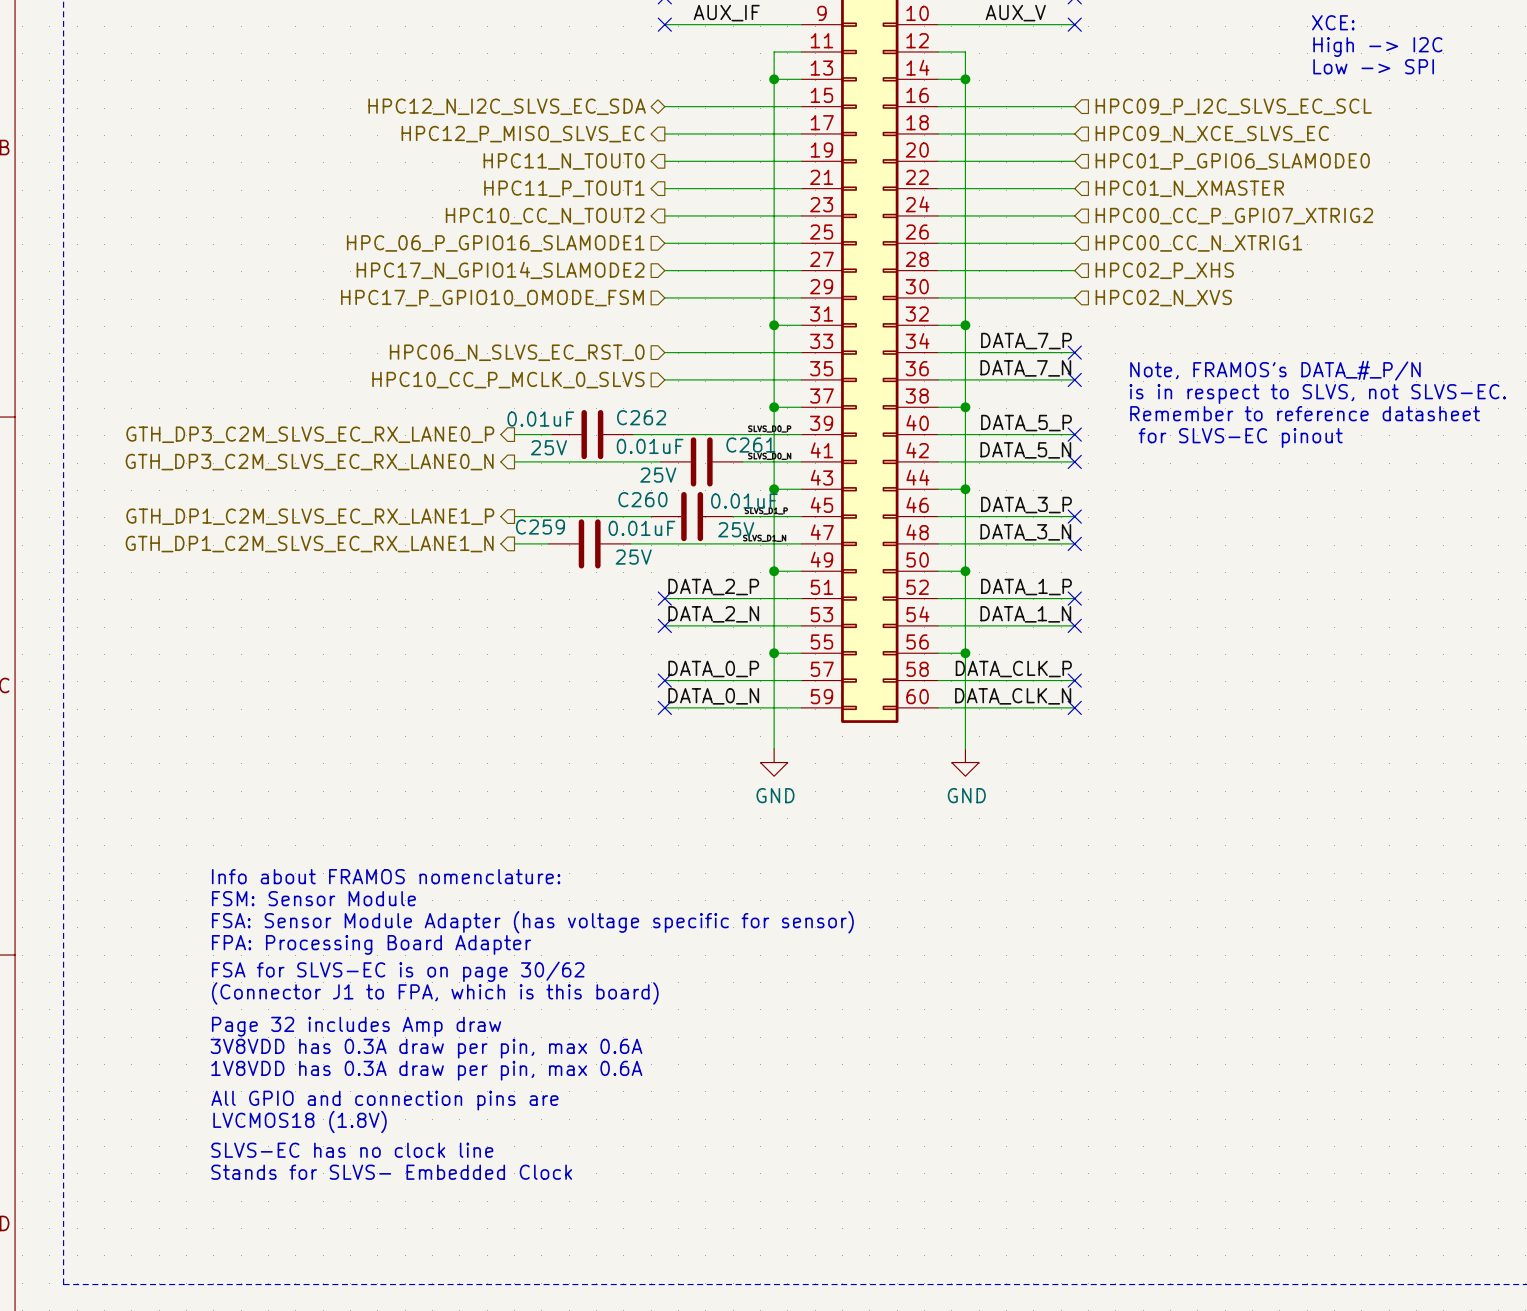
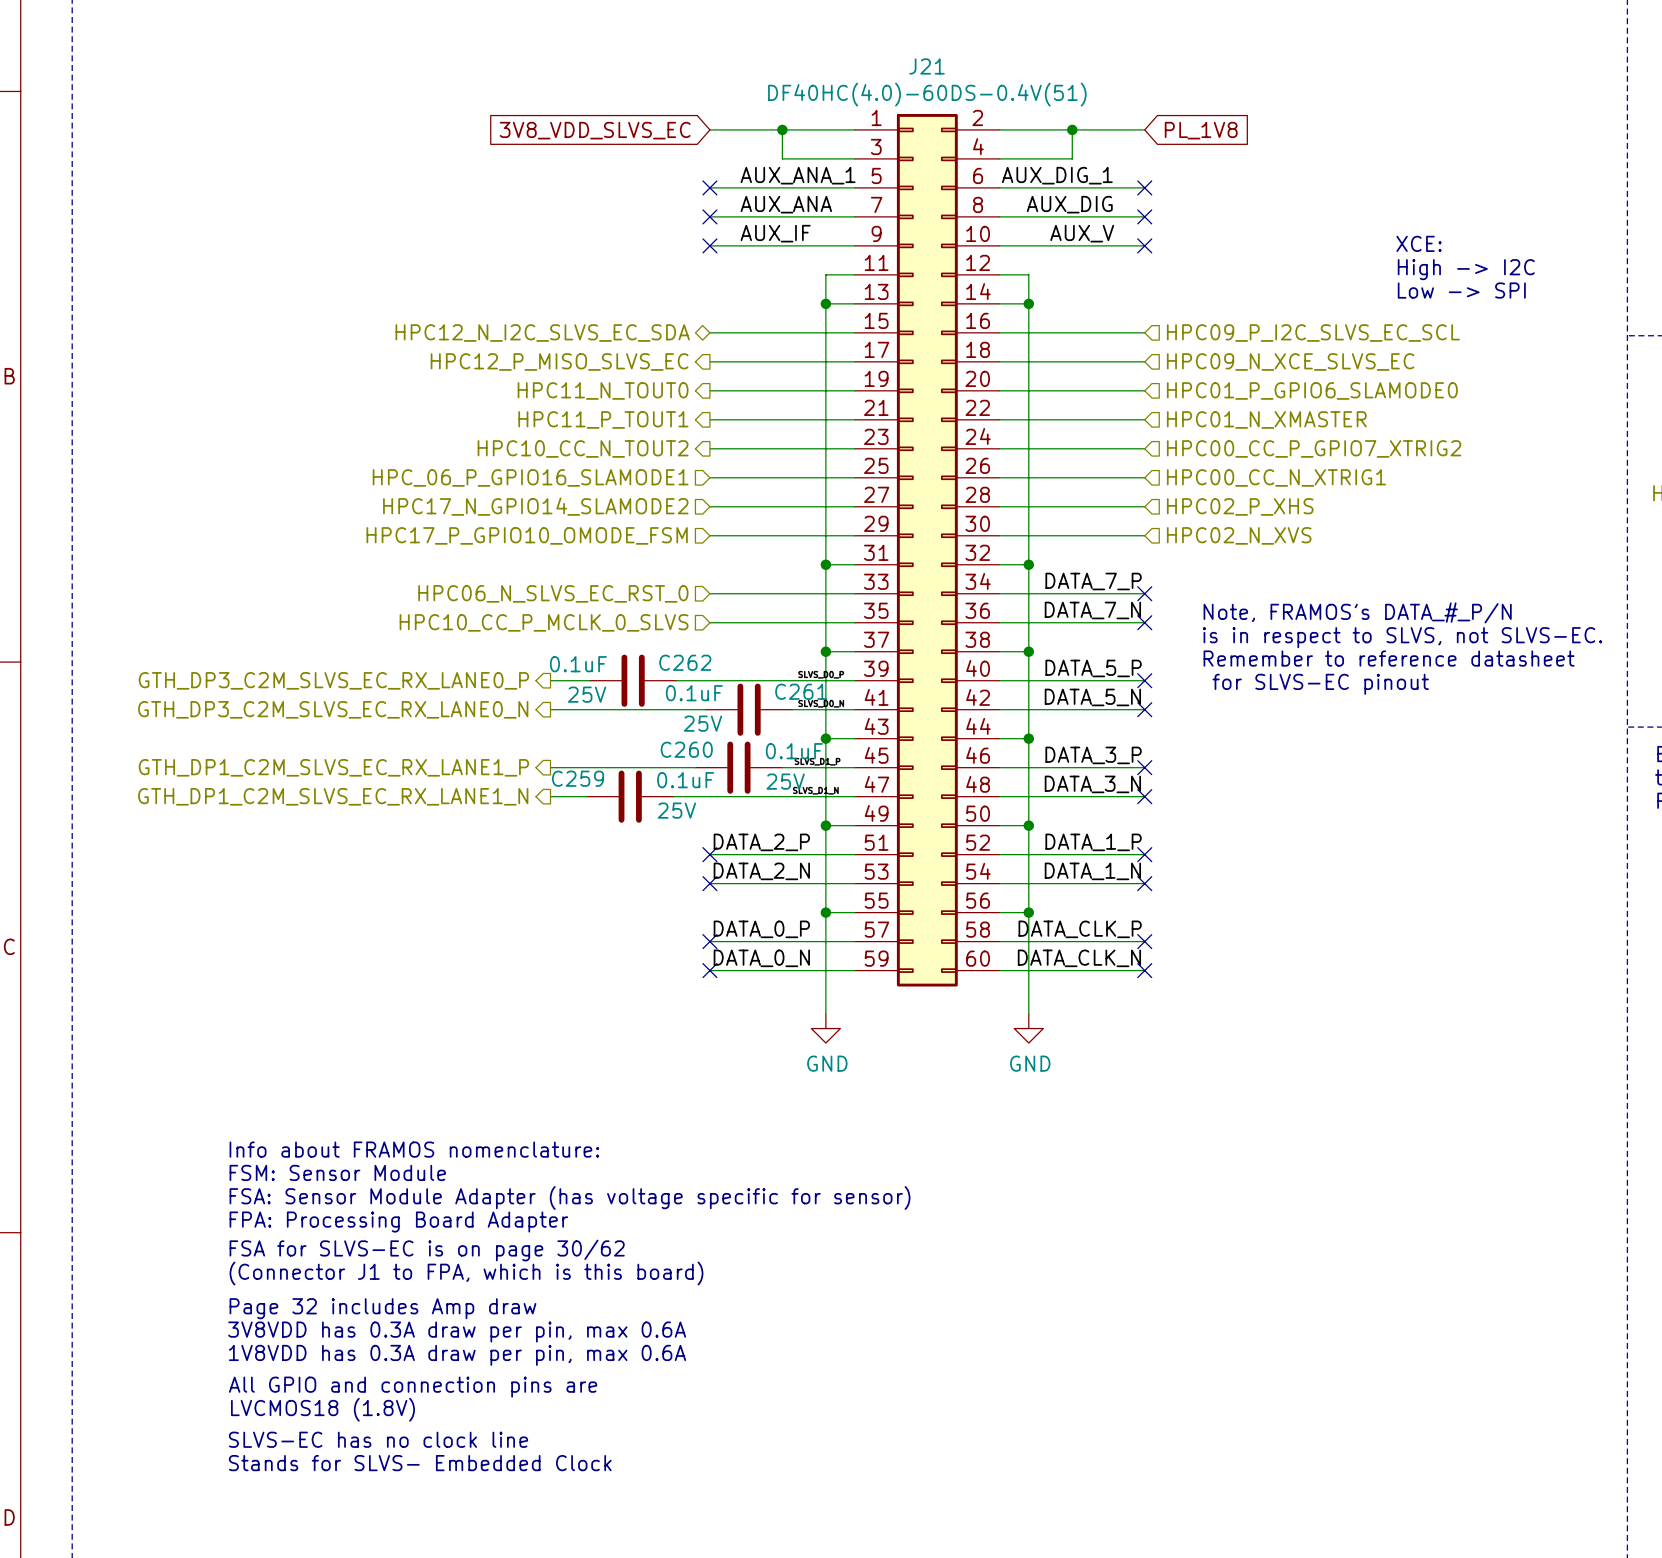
C262 value: 0.01uF (540, 419) -> 0.1uF (578, 664)
C261 value: 0.01uF (650, 446) -> 0.1uF (694, 693)
C260 value: 0.01uF (744, 501) -> 0.1uF (794, 751)
C259 value: 0.01uF (641, 528) -> 0.1uF (685, 780)

